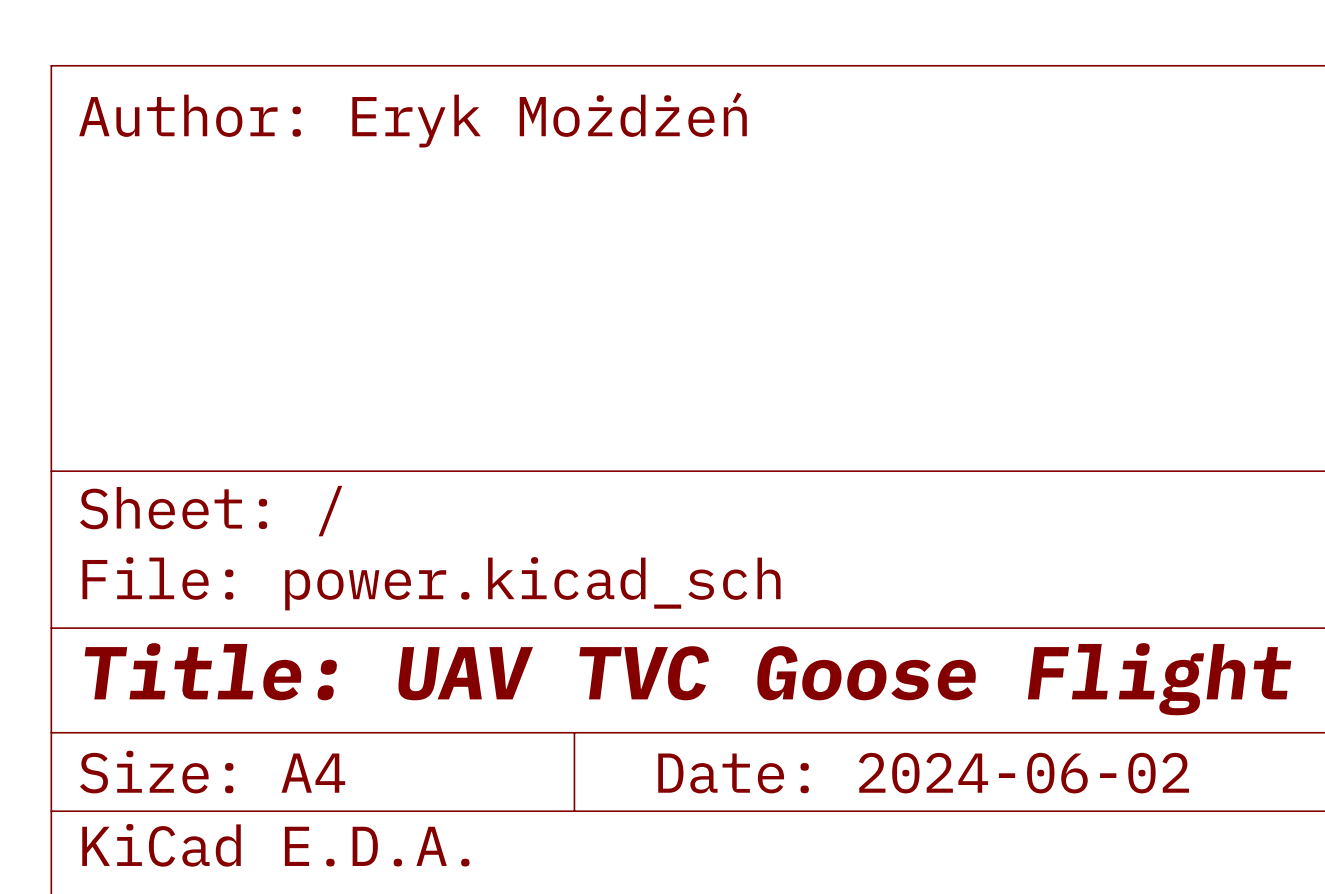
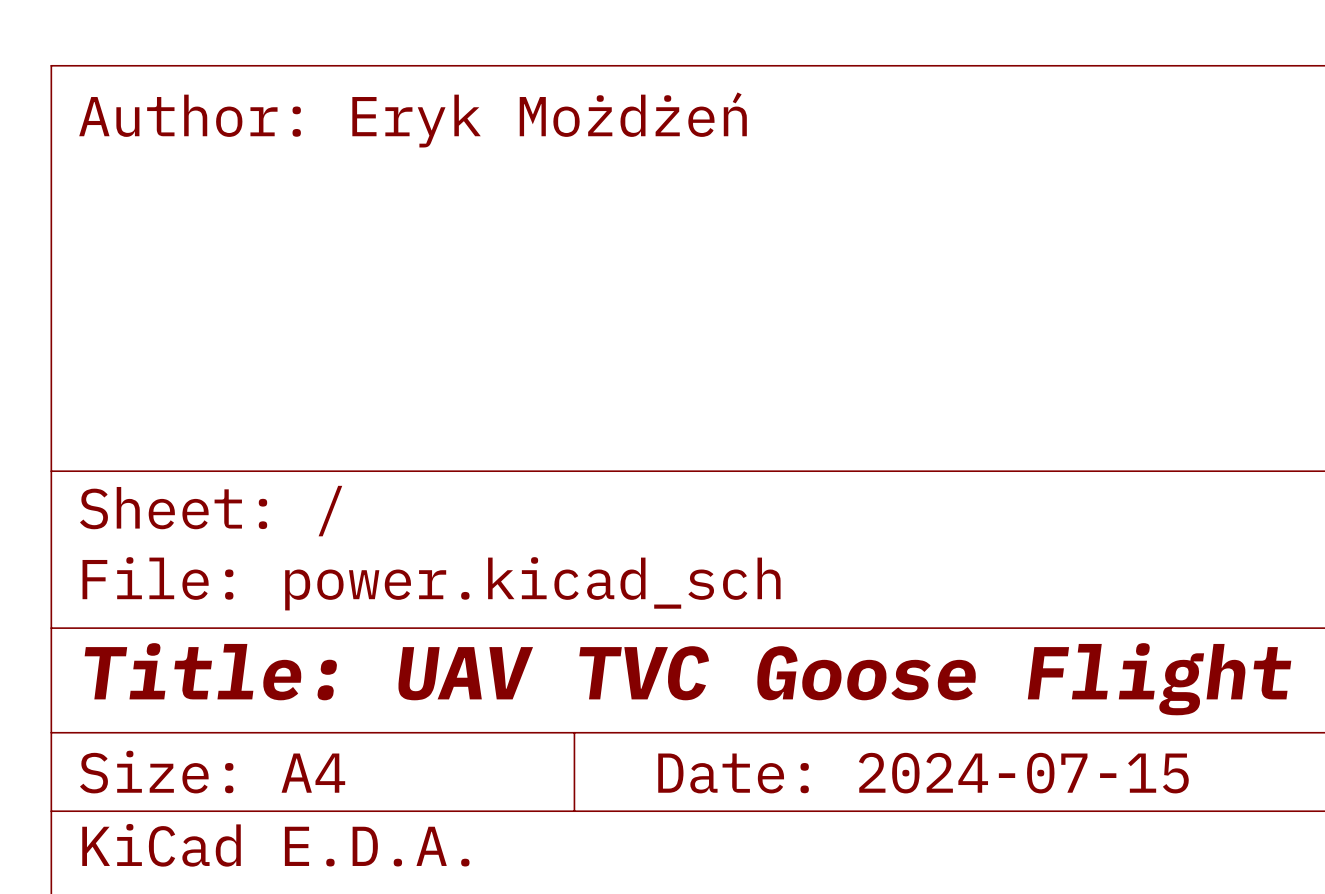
title block: Date: 2024-06-02 (923, 773) -> Date: 2024-07-15 (923, 773)

